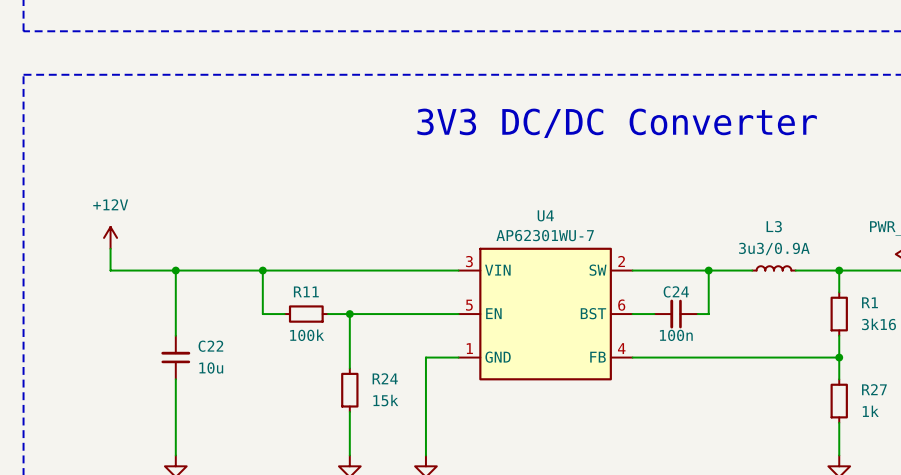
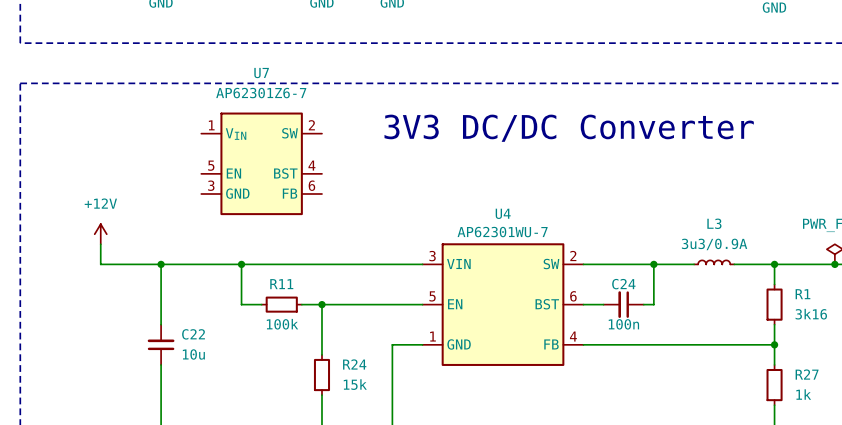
U7: none -> (261, 163)

